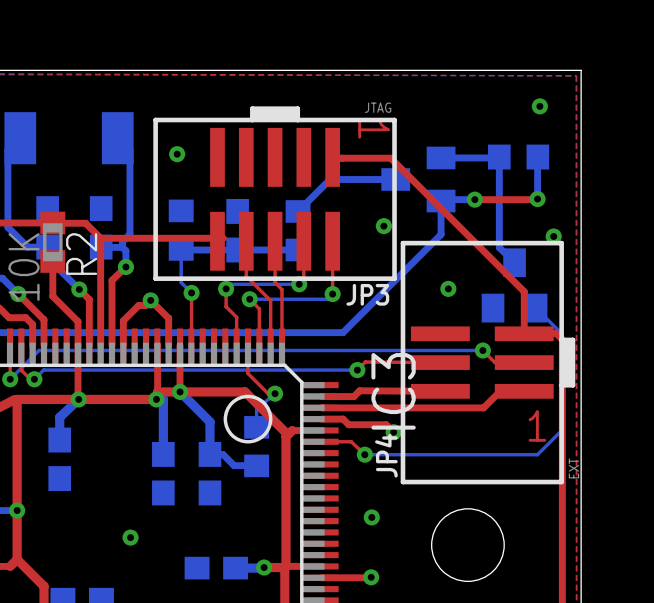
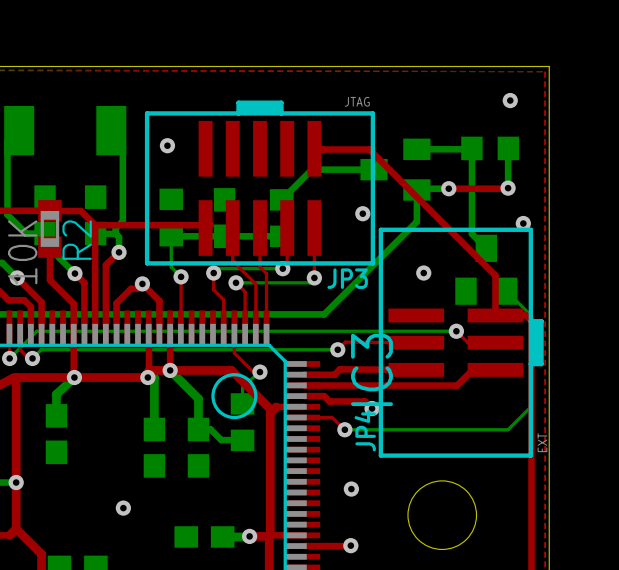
text: 1 (374, 129) -> none
text: 1 (537, 425) -> none

